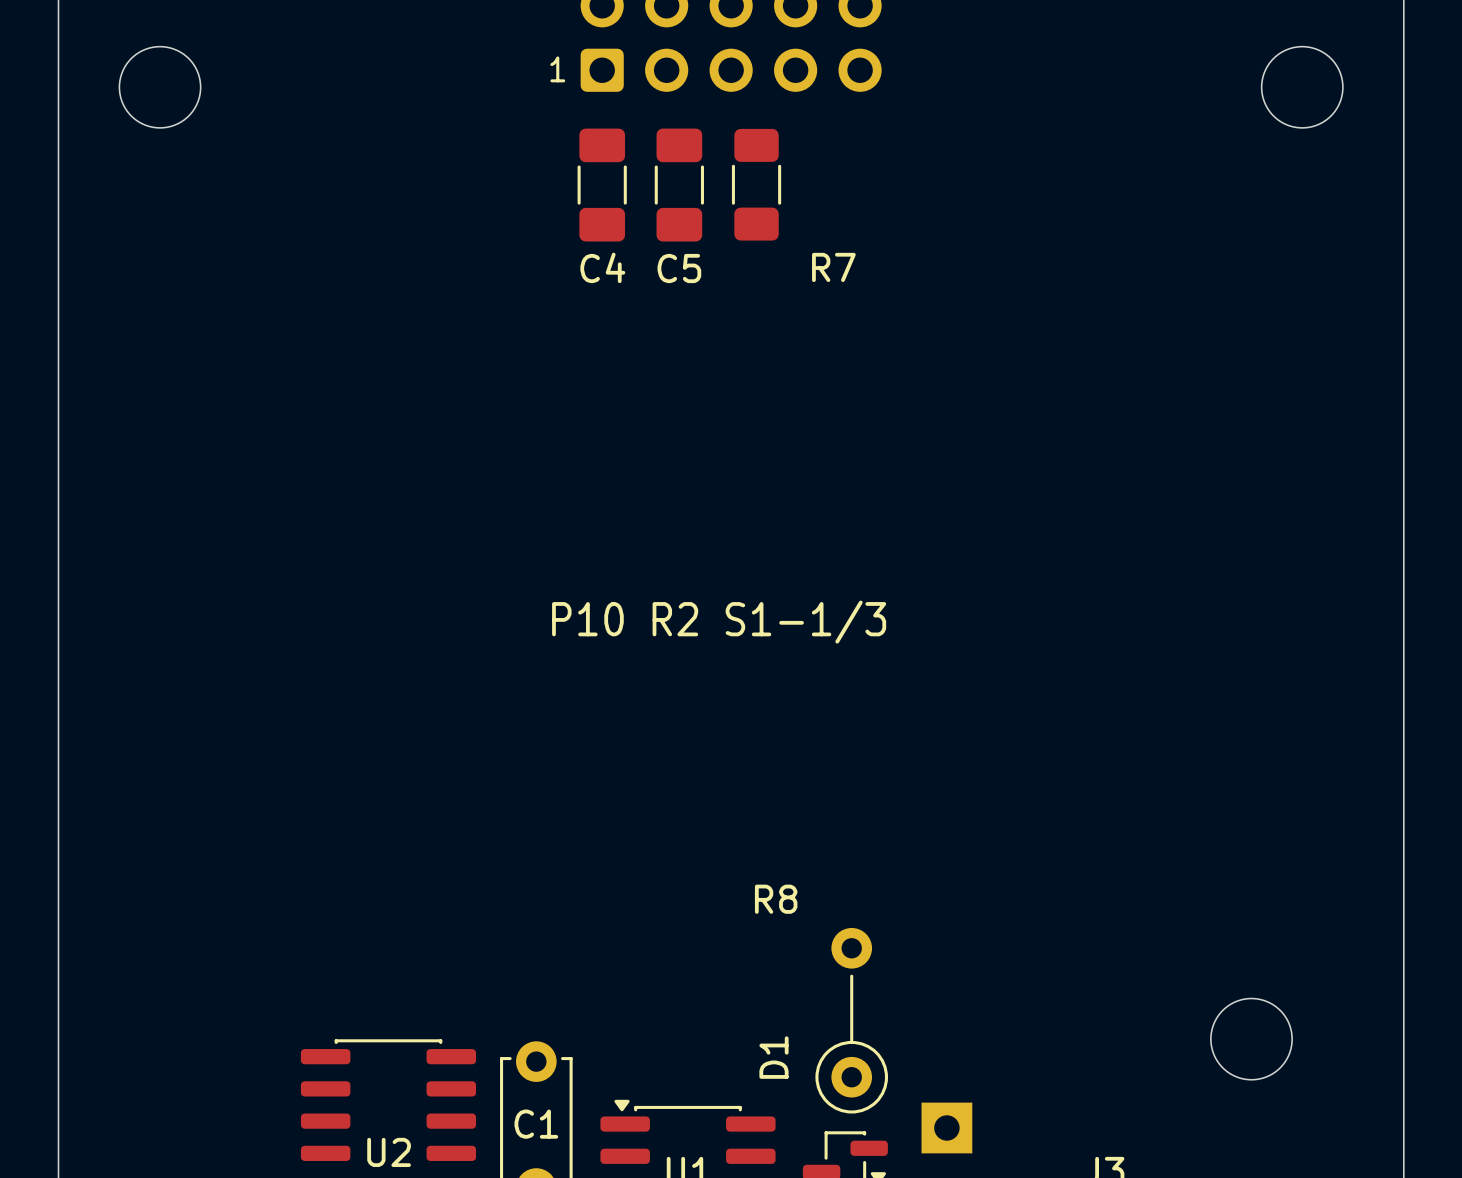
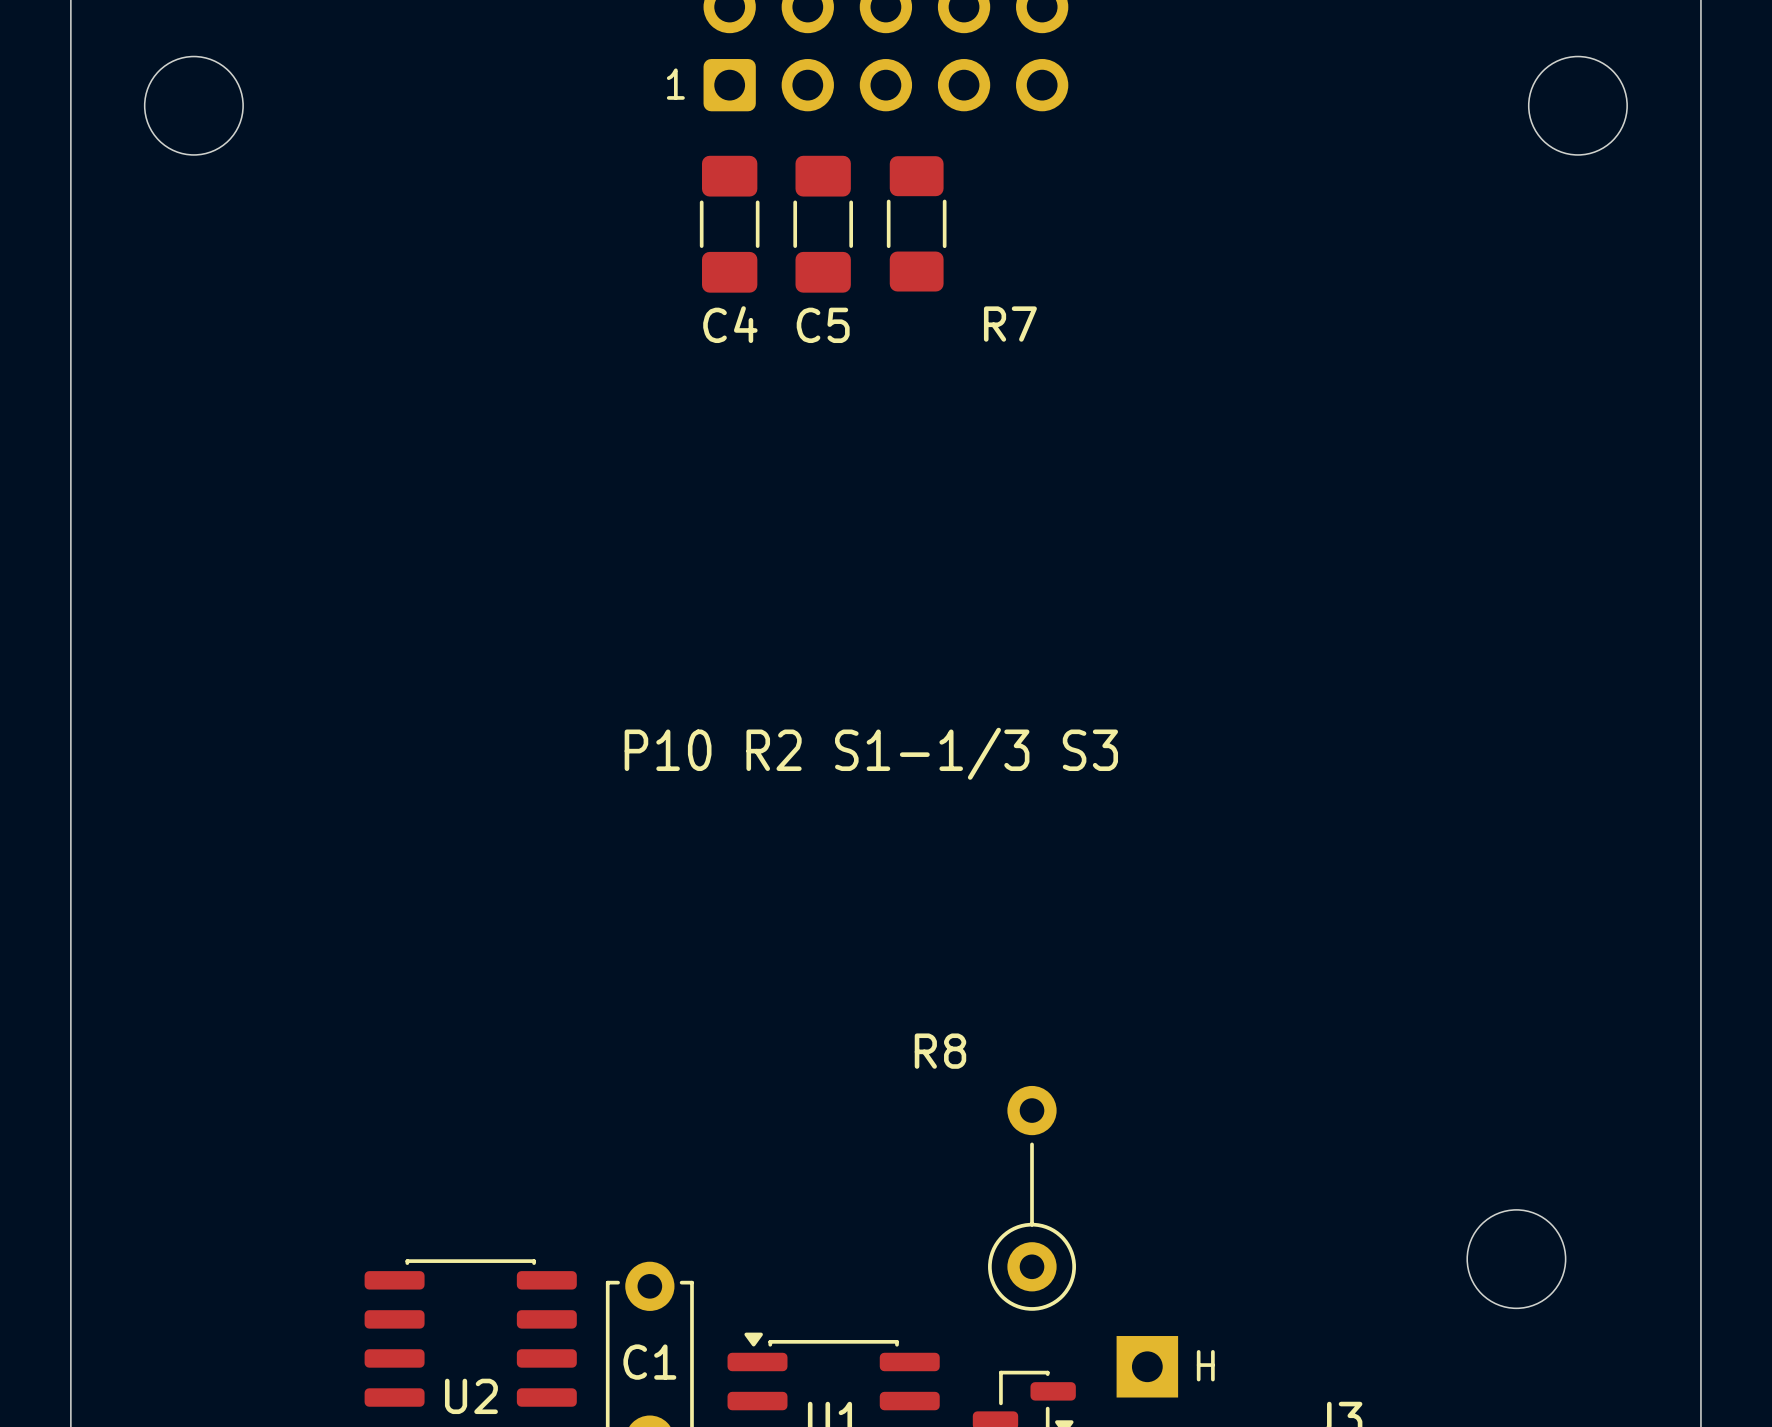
text: P10 R2 S1-1/3 (719, 622) -> P10 R2 S1-1/3 S3 (871, 753)
R8 position: (851, 1020) -> (1032, 1198)
D1 name: D1 (773, 1057) -> none
text: none -> H (1205, 1365)

